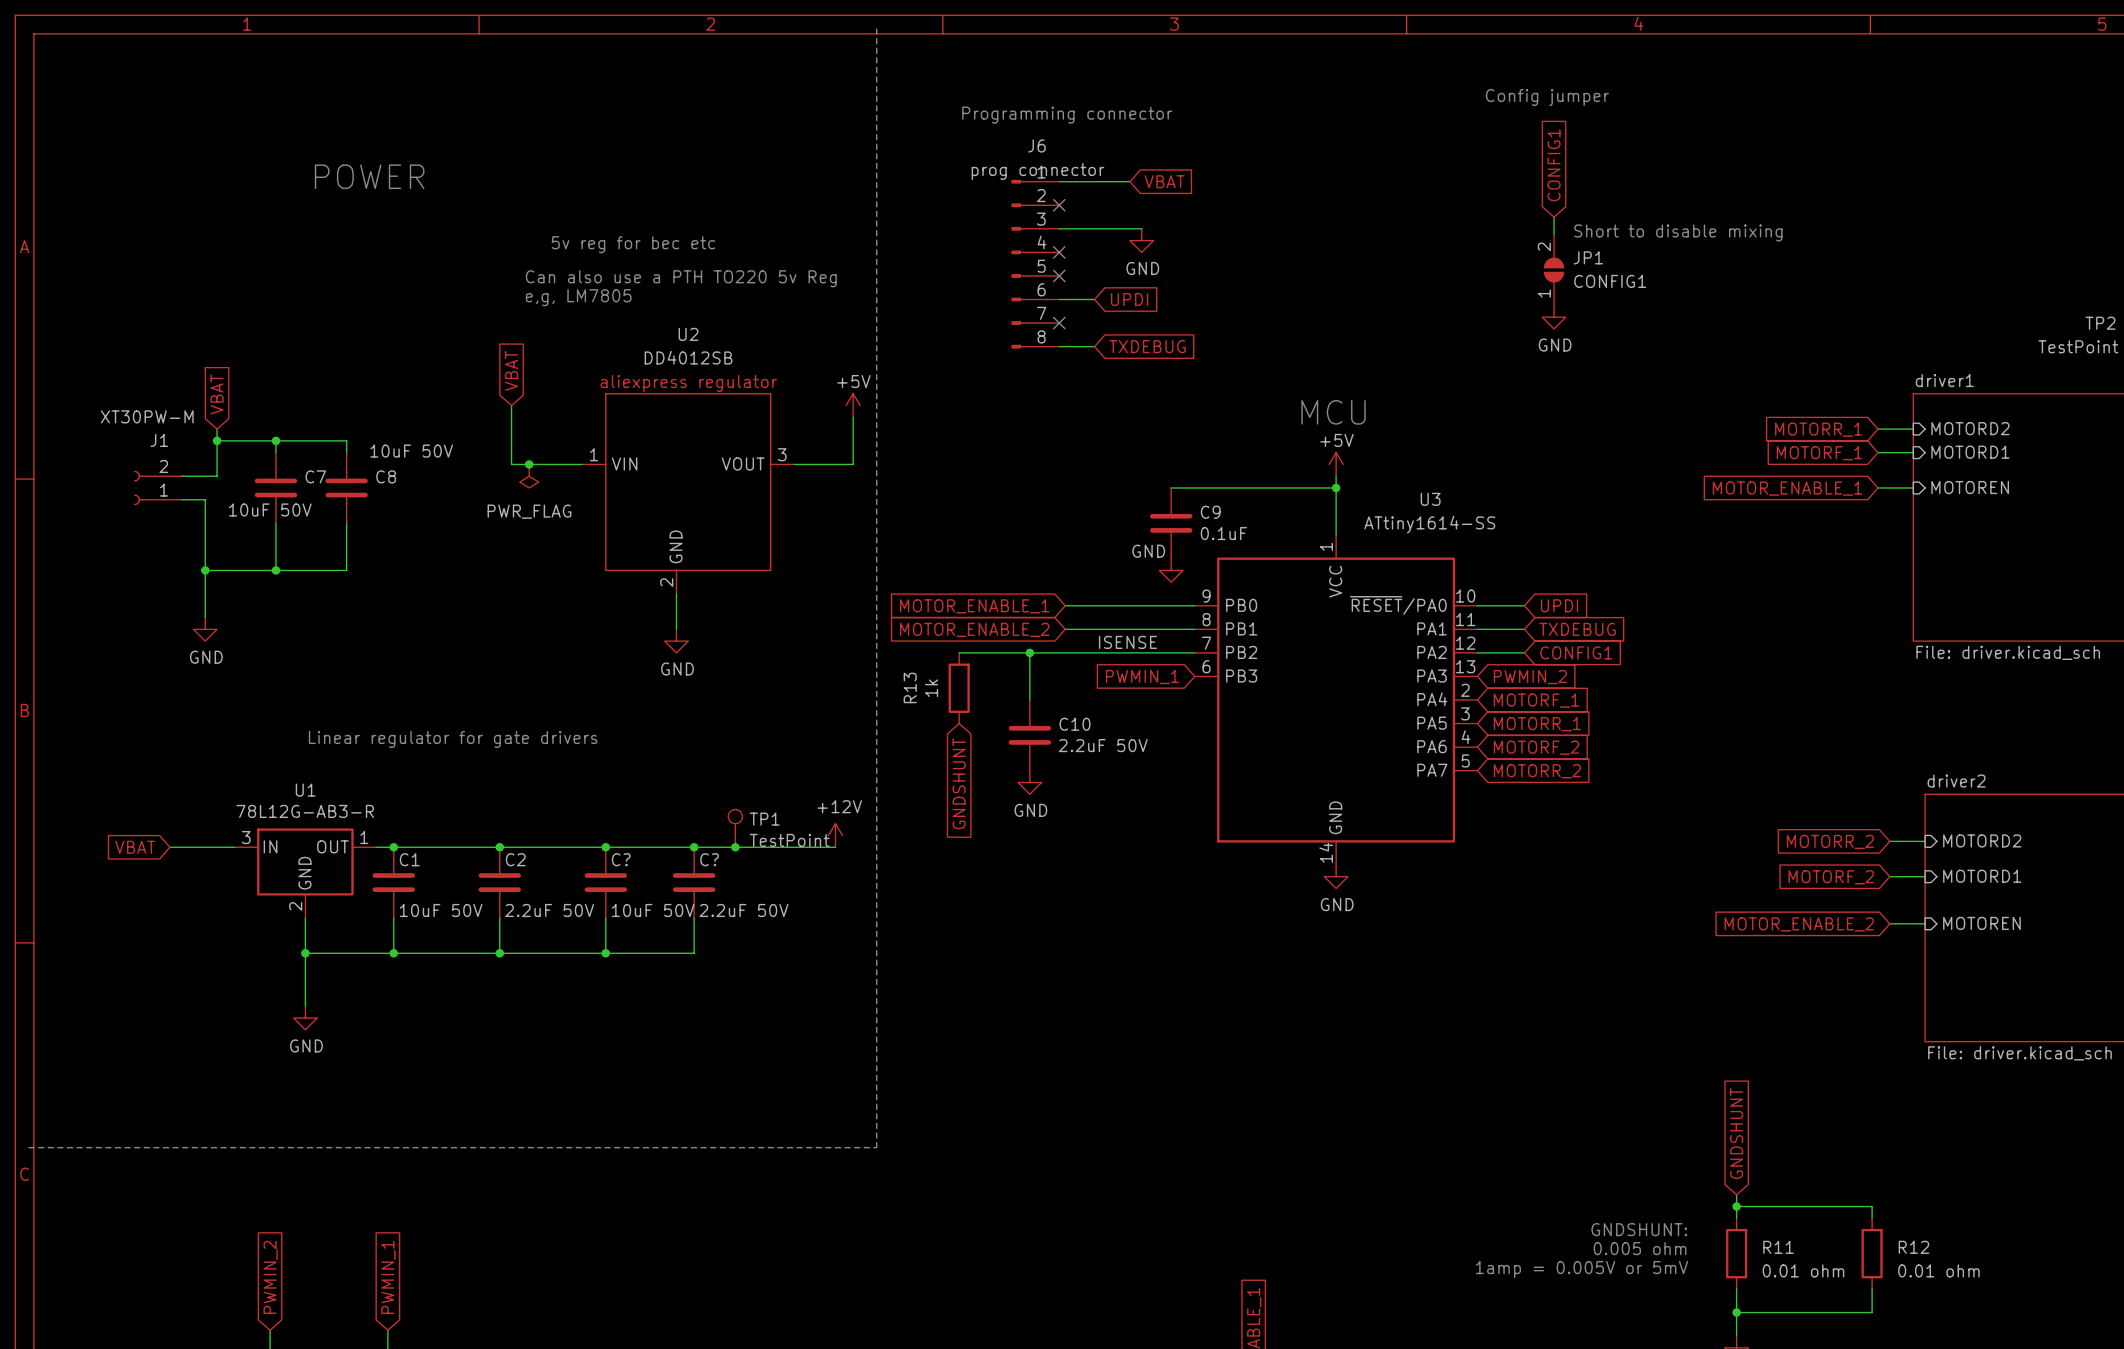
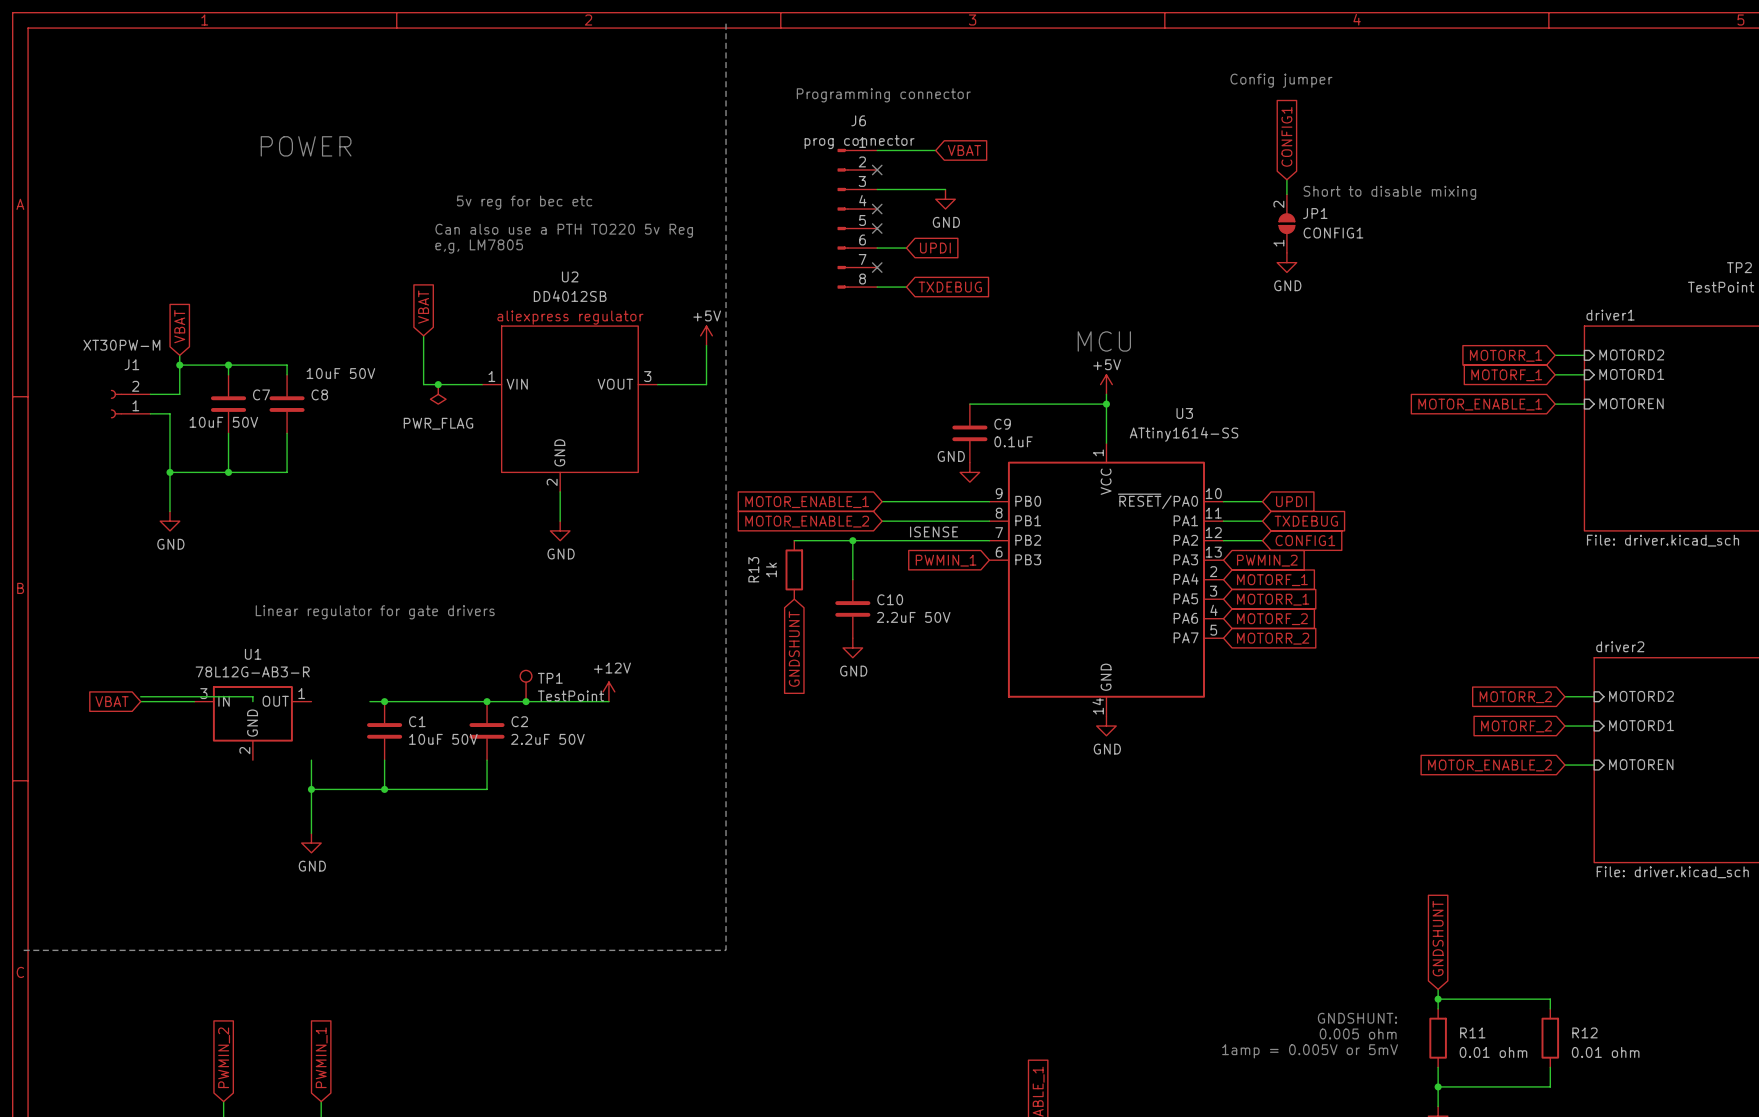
TP1 position: (735, 828) -> (526, 686)
power symbol position: +12V (835, 835) -> +12V (608, 691)
wire: none -> (140, 696) (252, 696) (252, 701)
wire: (376, 847) (446, 847) -> none
junction: (393, 847) -> none
junction: none -> (384, 701)
junction: (499, 847) -> none
junction: none -> (487, 701)
junction: (605, 847) -> none
junction: none -> (526, 701)
junction: (694, 847) -> none
wire: (735, 847) (835, 847) -> none
junction: (735, 847) -> none
C1 name position: C1 (409, 859) -> C1 (417, 721)
C2 name position: C2 (515, 859) -> C2 (519, 721)
C1 position: (393, 882) -> (384, 730)
C2 position: (499, 882) -> (487, 730)
C?: 10uF 50V (605, 882) -> none
C?: 2.2uF 50V (694, 882) -> none
C1 value position: 10uF 50V (441, 910) -> 10uF 50V (443, 739)
C2 value position: 2.2uF 50V (549, 910) -> 2.2uF 50V (547, 739)
wire: (305, 917) (305, 1006) -> (311, 760) (311, 833)
wire: (393, 917) (393, 953) -> (384, 760) (384, 789)
wire: (499, 917) (499, 953) -> none
wire: (605, 917) (605, 953) -> none
wire: (694, 917) (694, 953) (588, 953) -> (487, 760) (487, 789)
wire: (305, 953) (376, 953) -> none
junction: (305, 953) -> none
junction position: (393, 953) -> (311, 789)
junction: none -> (384, 789)
junction: (499, 953) -> none
junction: (605, 953) -> none
power symbol position: GND (305, 1018) -> GND (311, 843)

